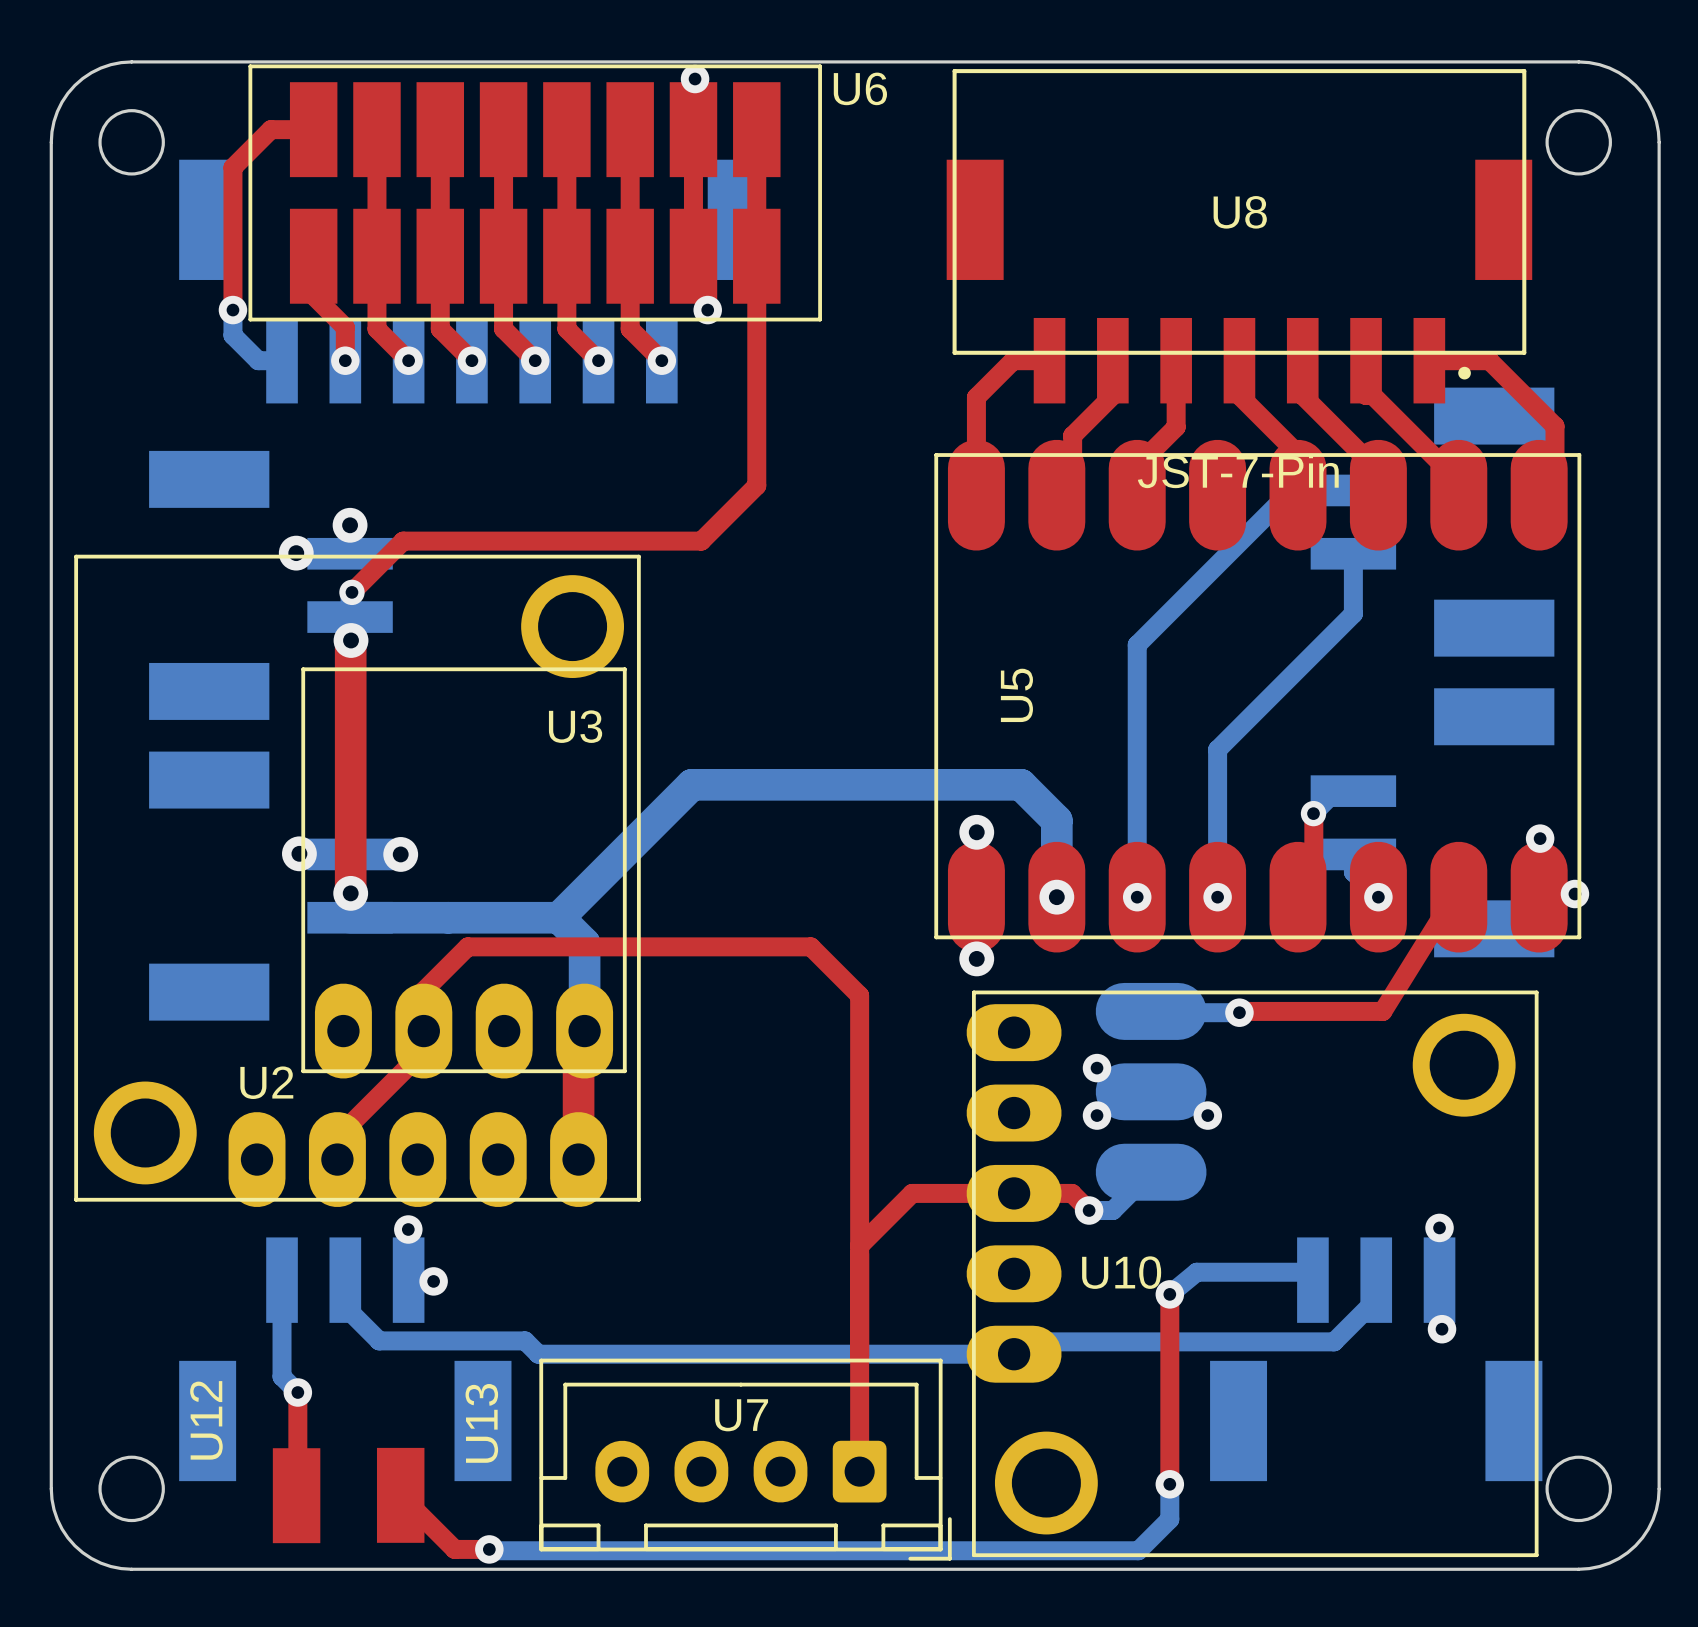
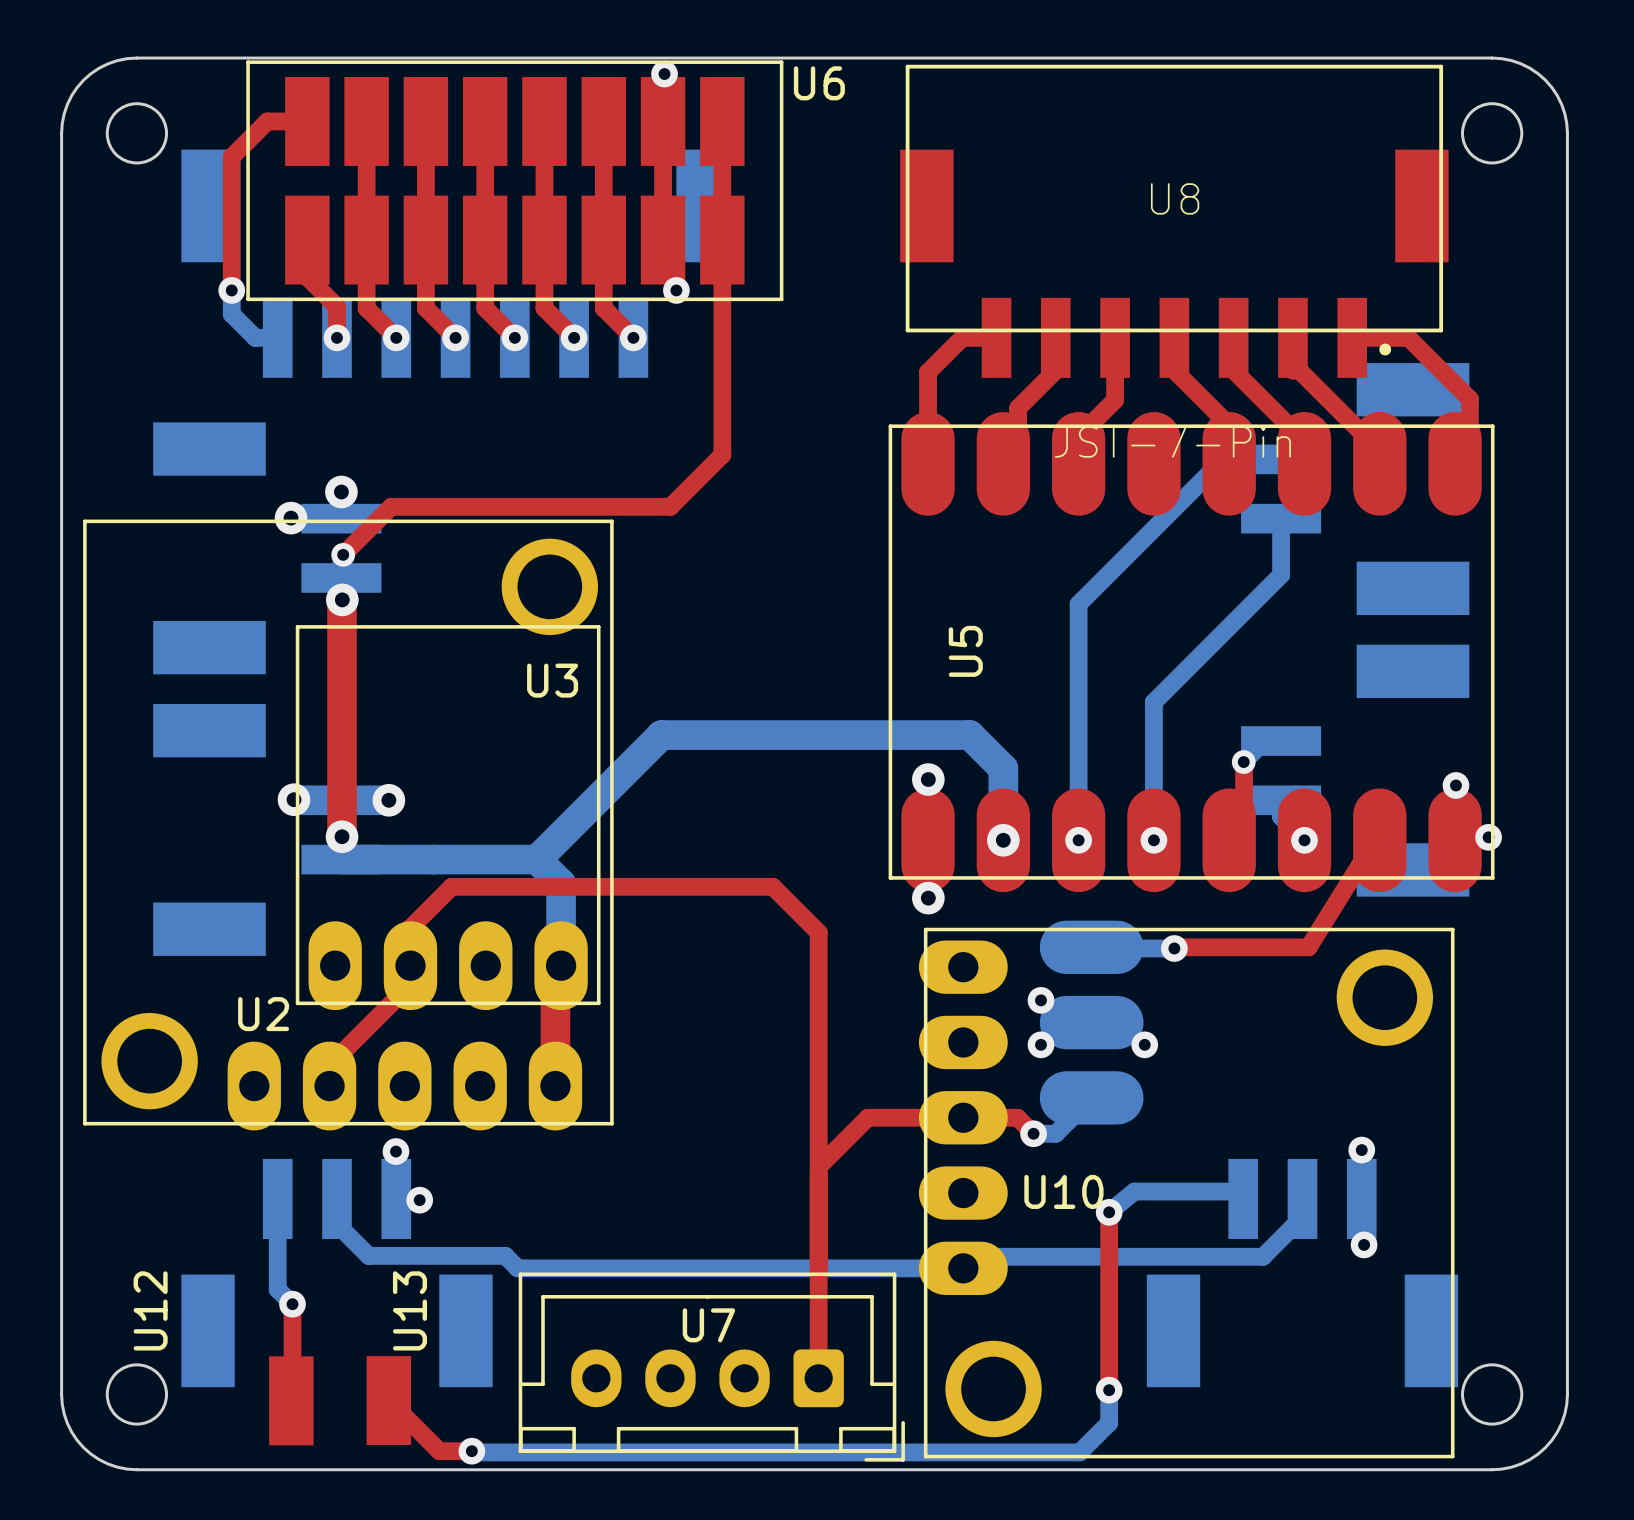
U12 name position: U12 (206, 1420) -> U12 (150, 1310)
U13 name position: U13 (481, 1423) -> U13 (409, 1310)

